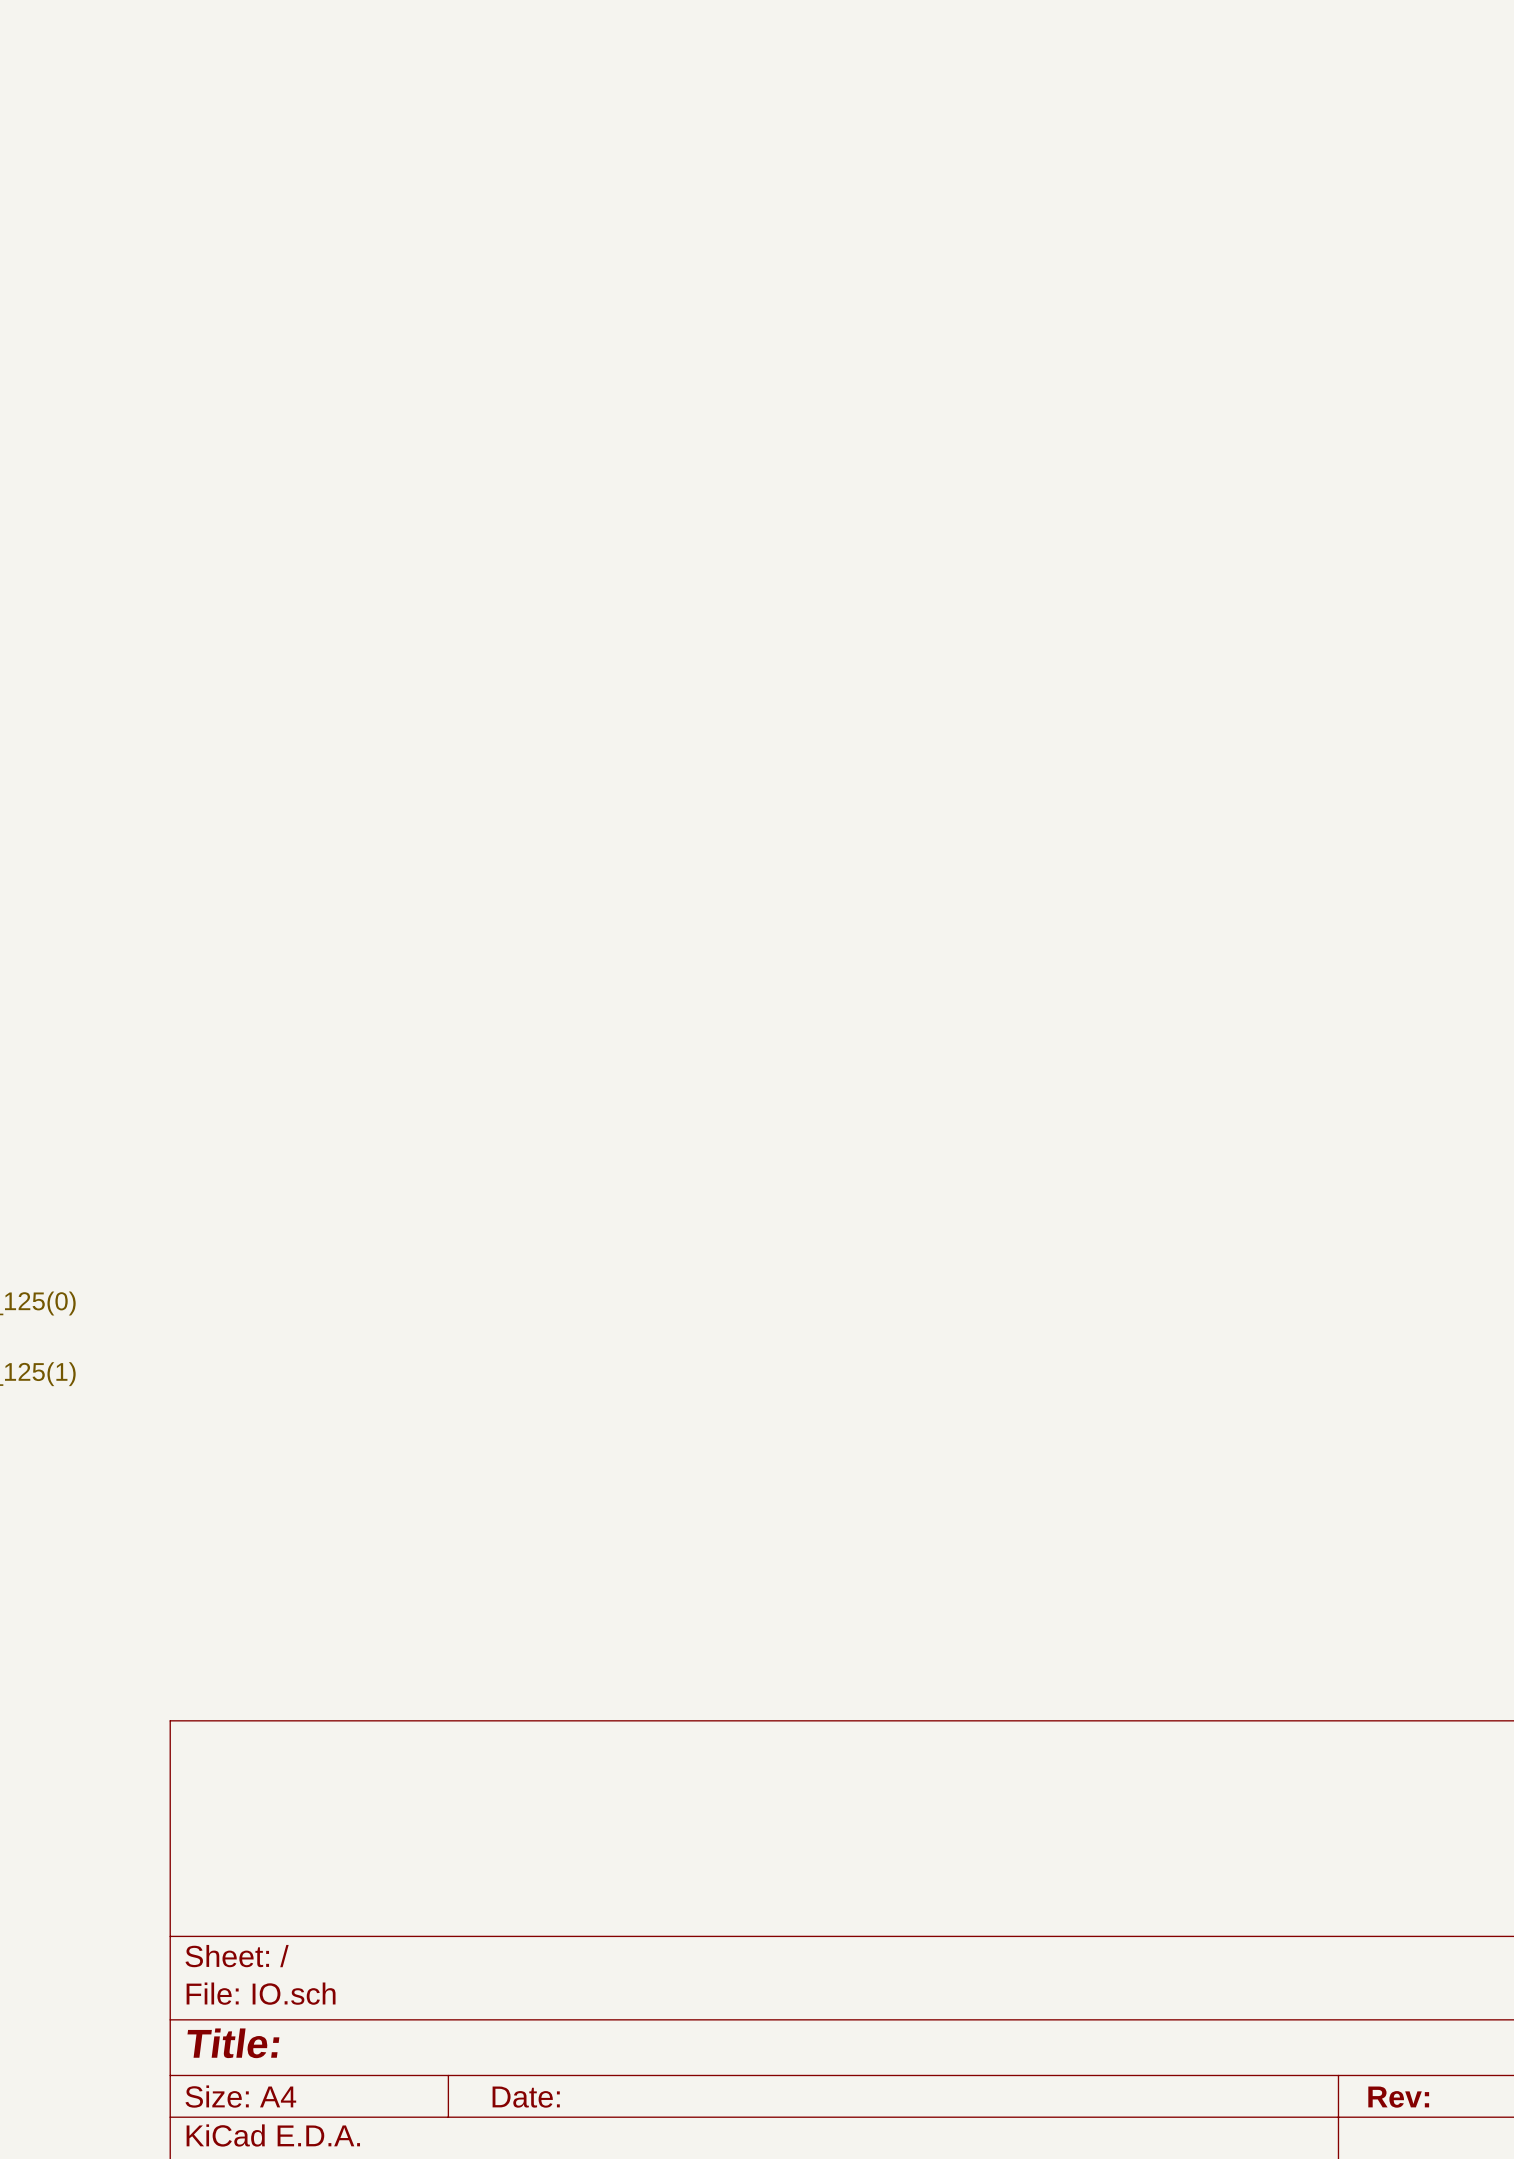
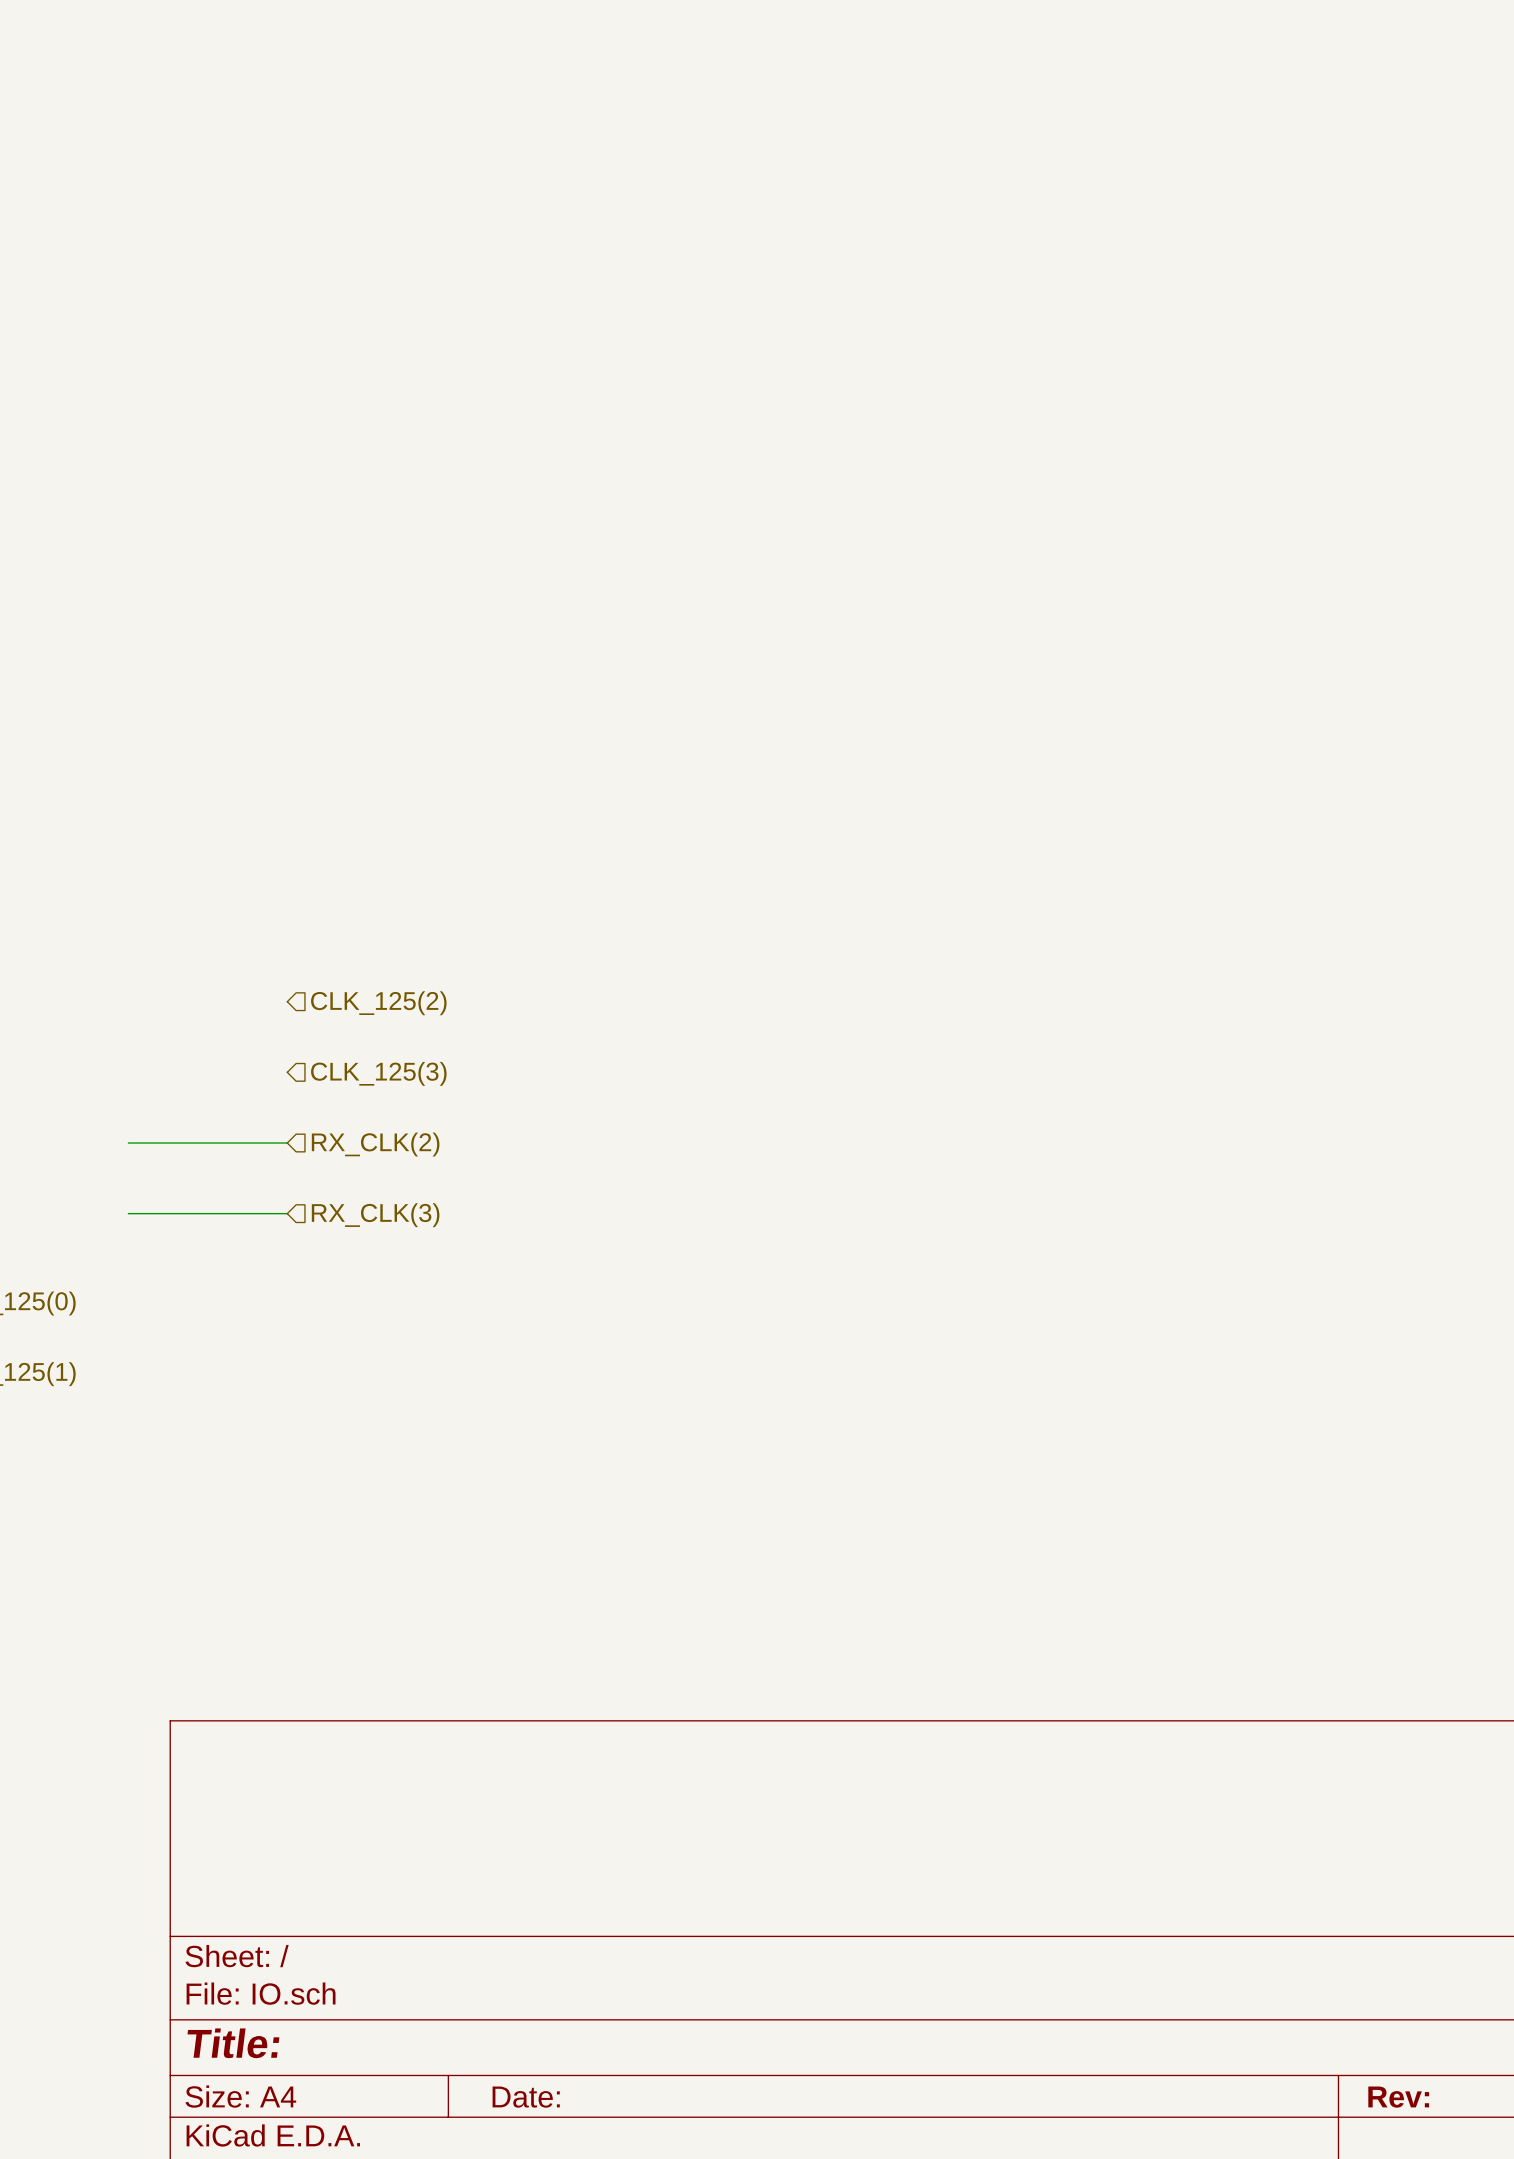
hierarchical label: none -> CLK_125(2) (378, 1003)
hierarchical label: none -> CLK_125(3) (378, 1073)
wire: none -> (128, 1143) (287, 1143)
hierarchical label: none -> RX_CLK(2) (375, 1144)
wire: none -> (128, 1213) (287, 1213)
hierarchical label: none -> RX_CLK(3) (375, 1215)

